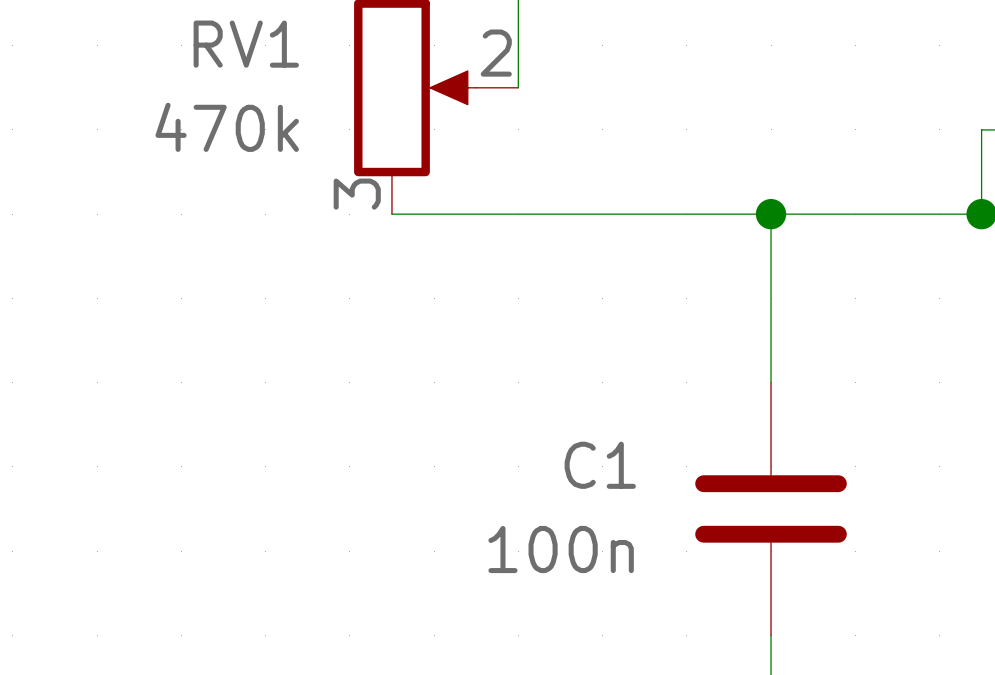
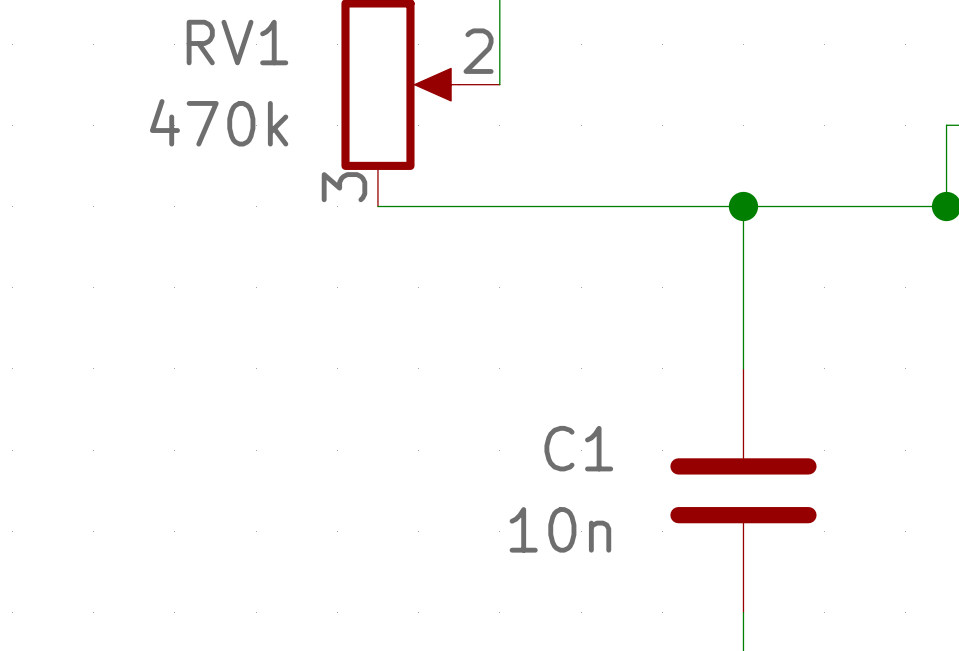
C1 value: 100n (561, 549) -> 10n (560, 529)

